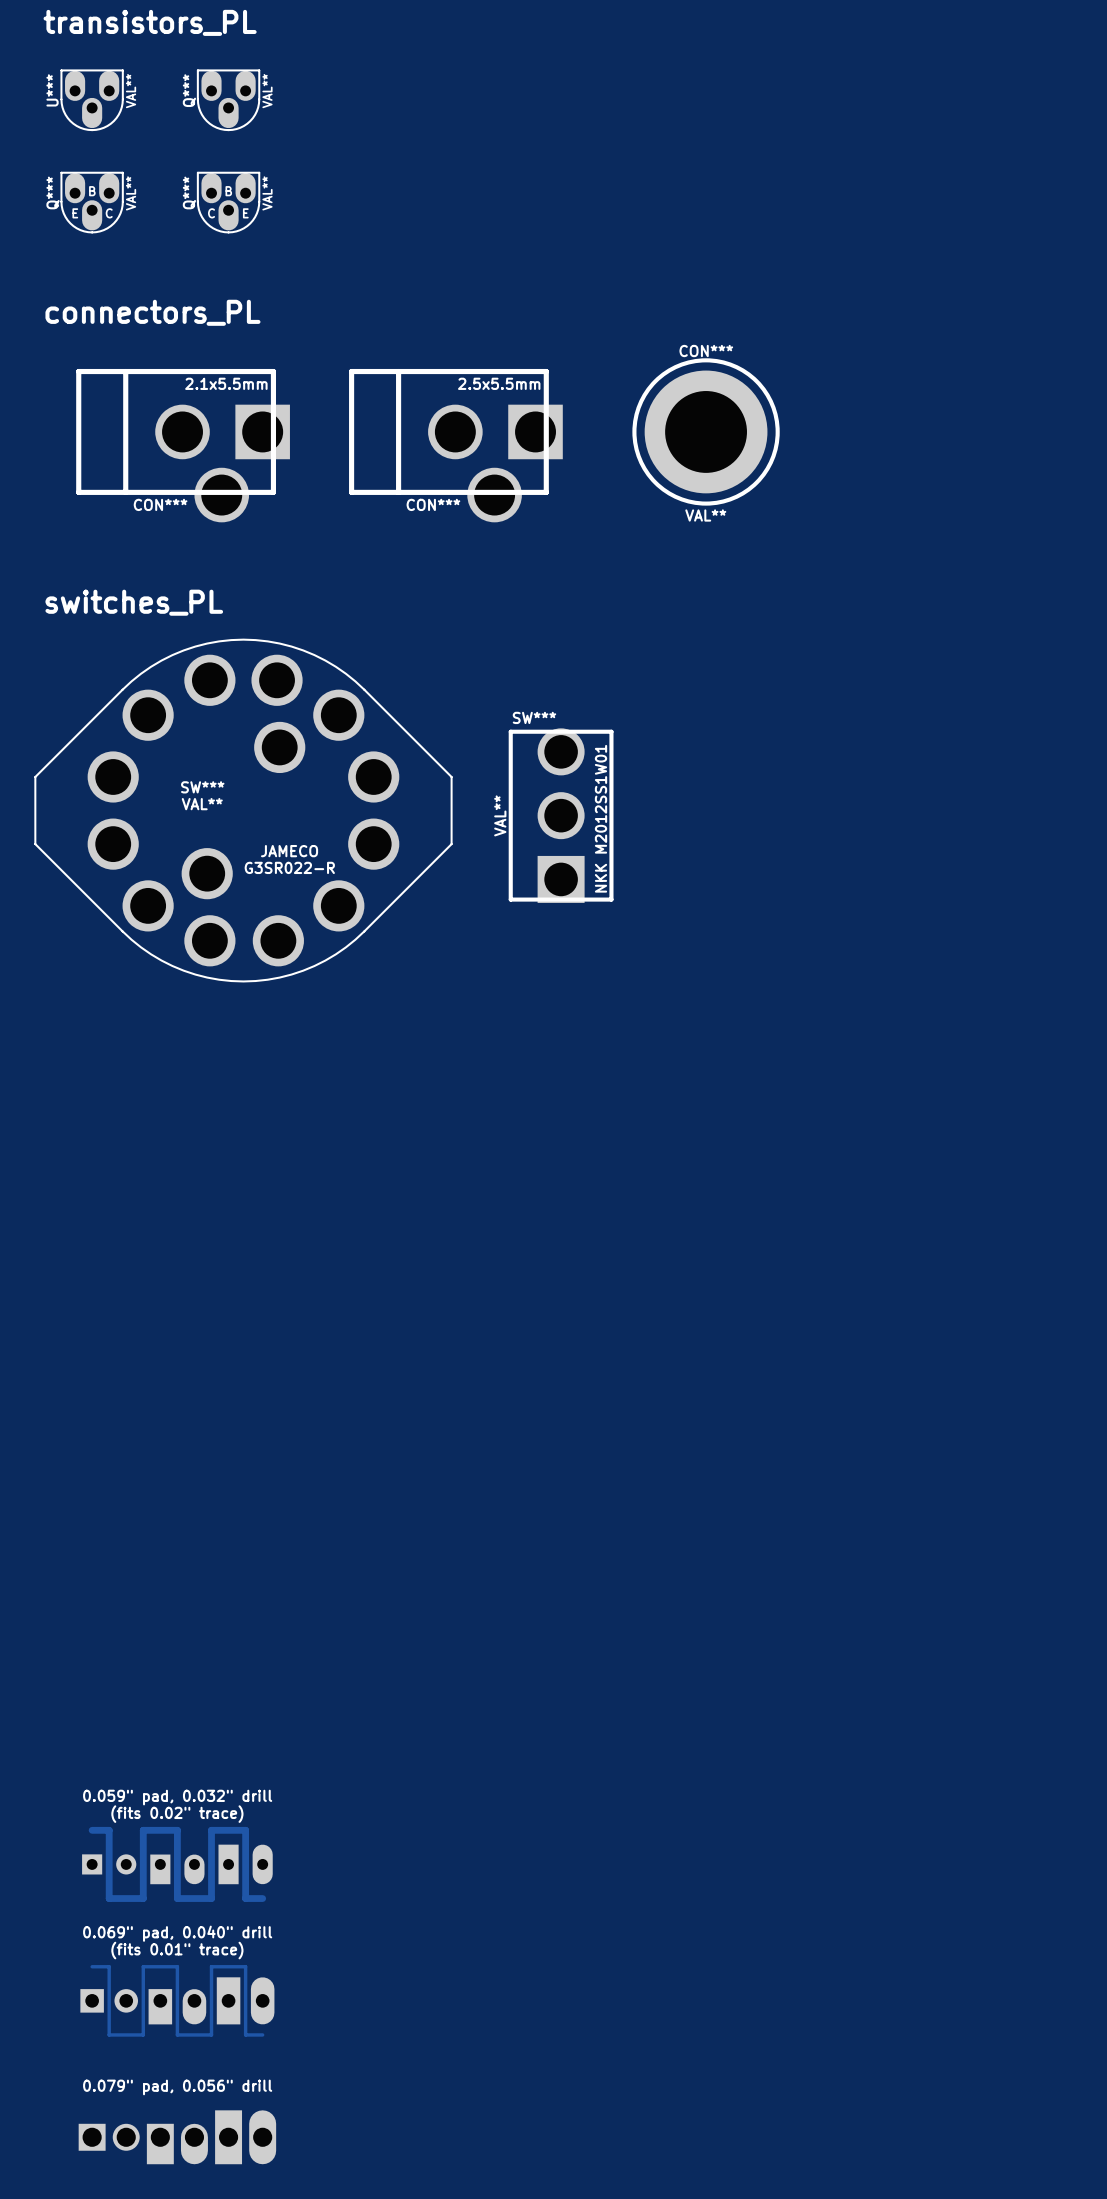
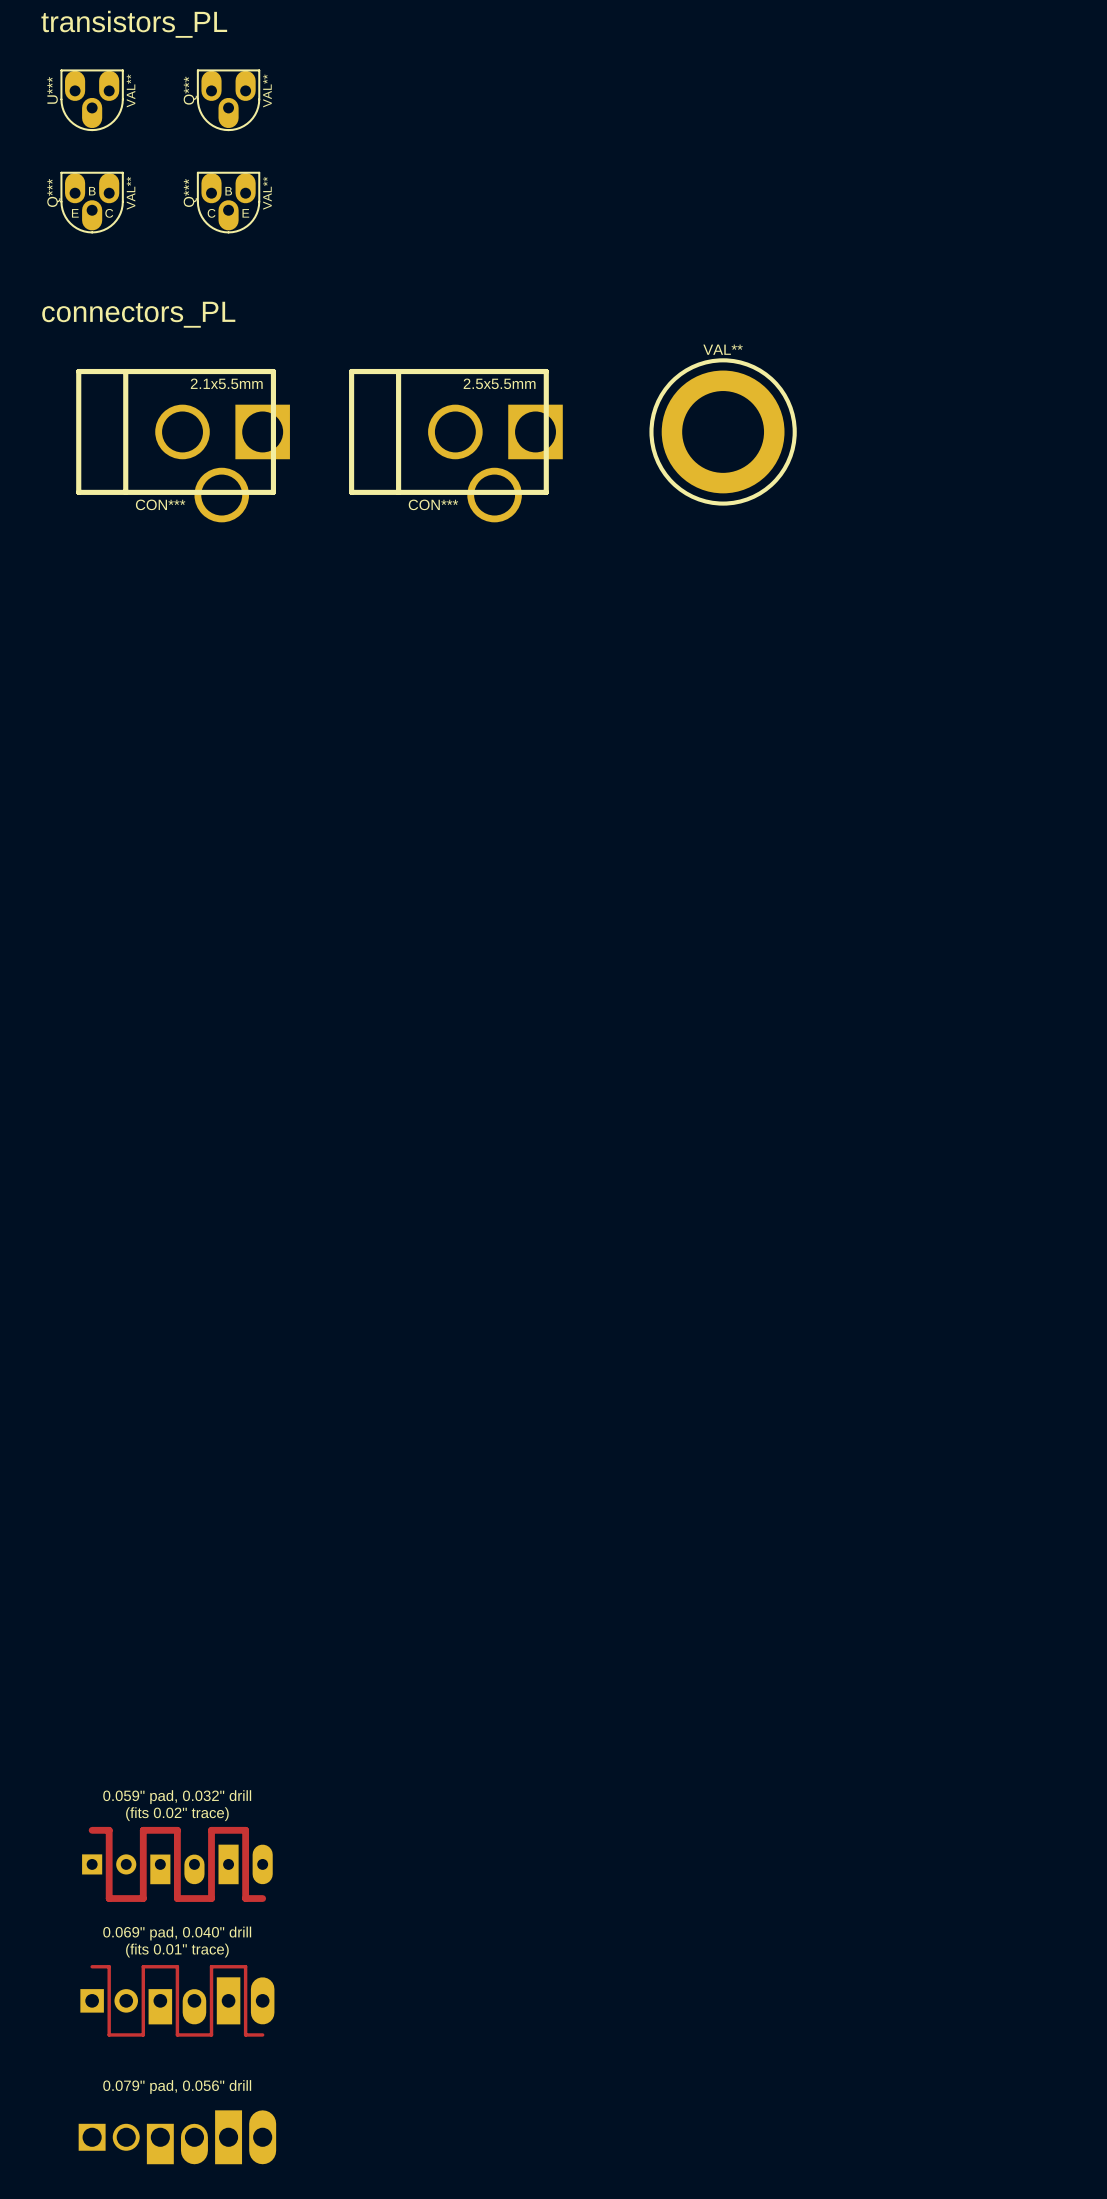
CON***: VAL** (706, 431) -> none
part: none -> VAL** (723, 431)
text: switches_PL (134, 602) -> none
SW***: VAL** (243, 810) -> none
SW***: VAL** (561, 815) -> none

